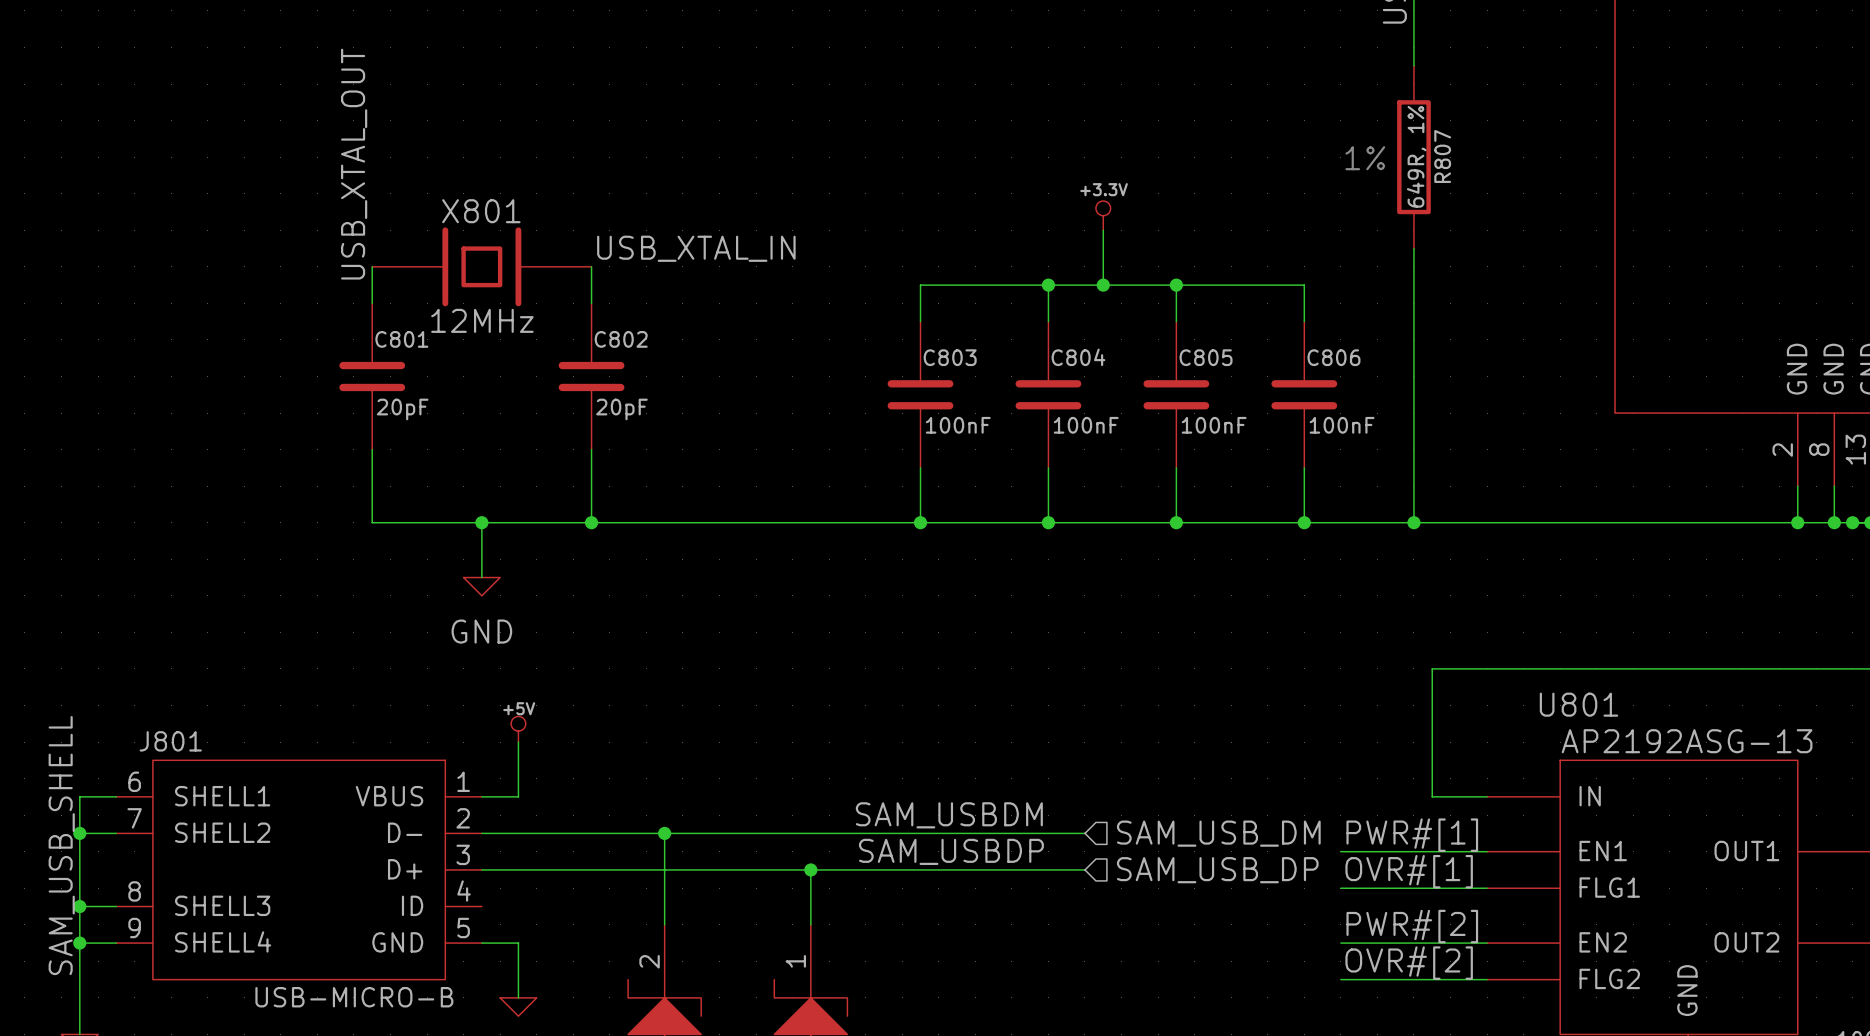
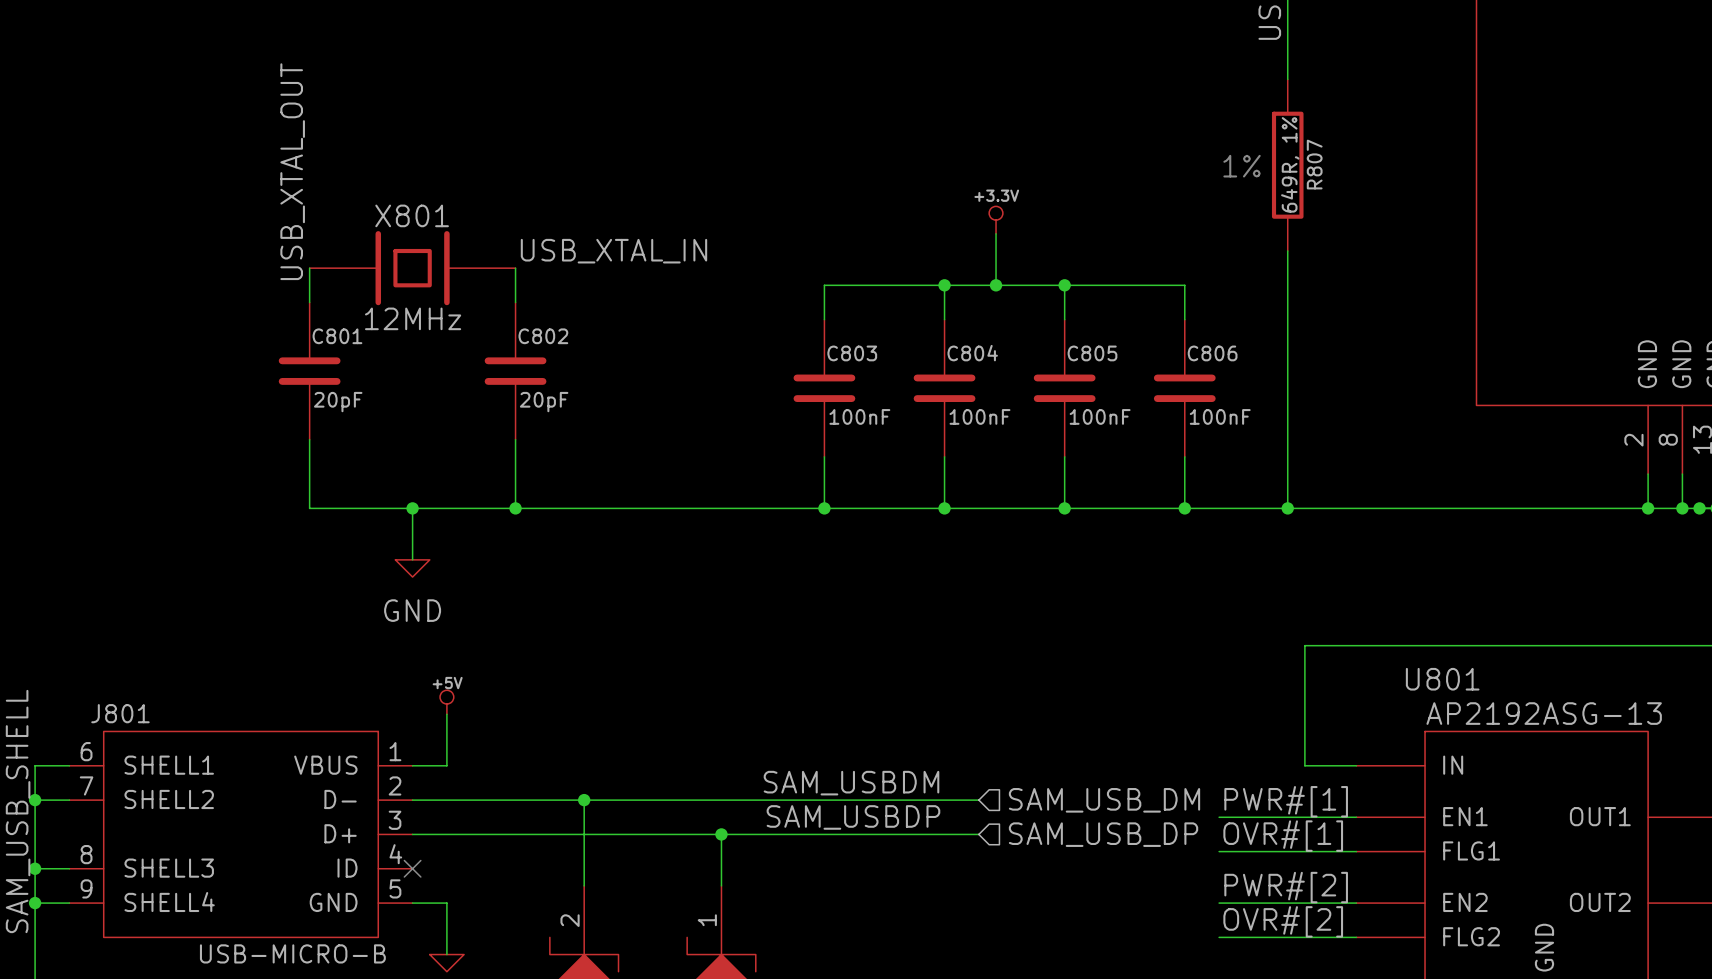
no-connect mark: none -> (412, 868)

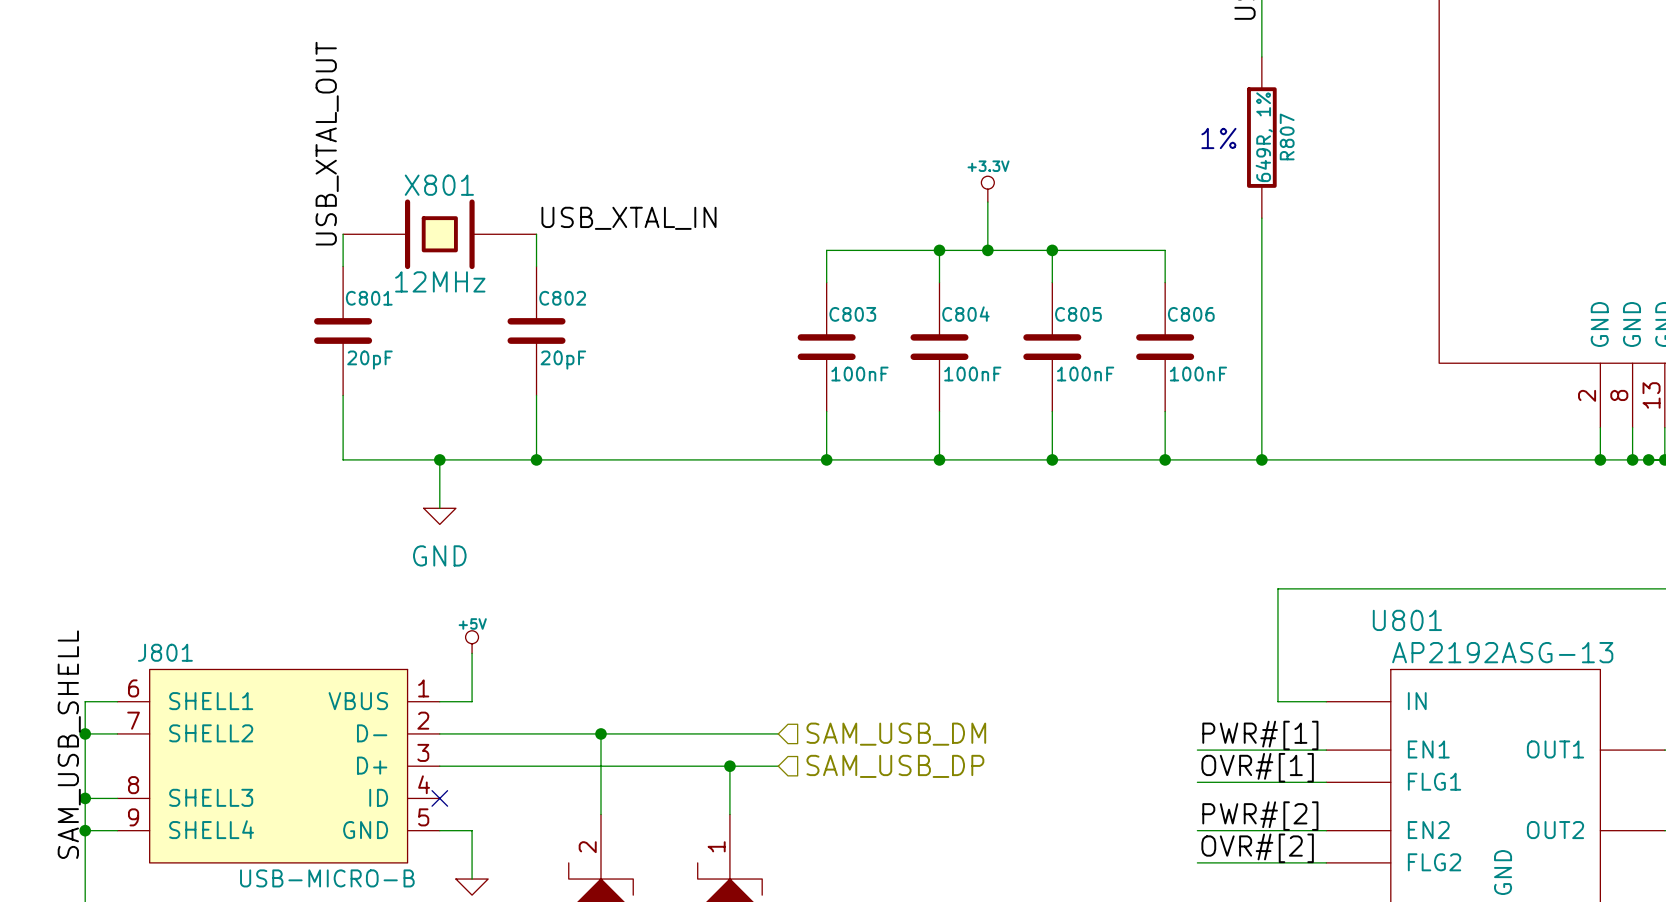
label: SAM_USBDM (851, 783) -> none
wire: (772, 800) (978, 800) -> none
hierarchical label position: SAM_USB_DM (1104, 800) -> SAM_USB_DM (896, 734)
label: SAM_USBDP (853, 817) -> none
wire: (772, 834) (978, 834) -> none
hierarchical label position: SAM_USB_DP (1103, 834) -> SAM_USB_DP (895, 766)

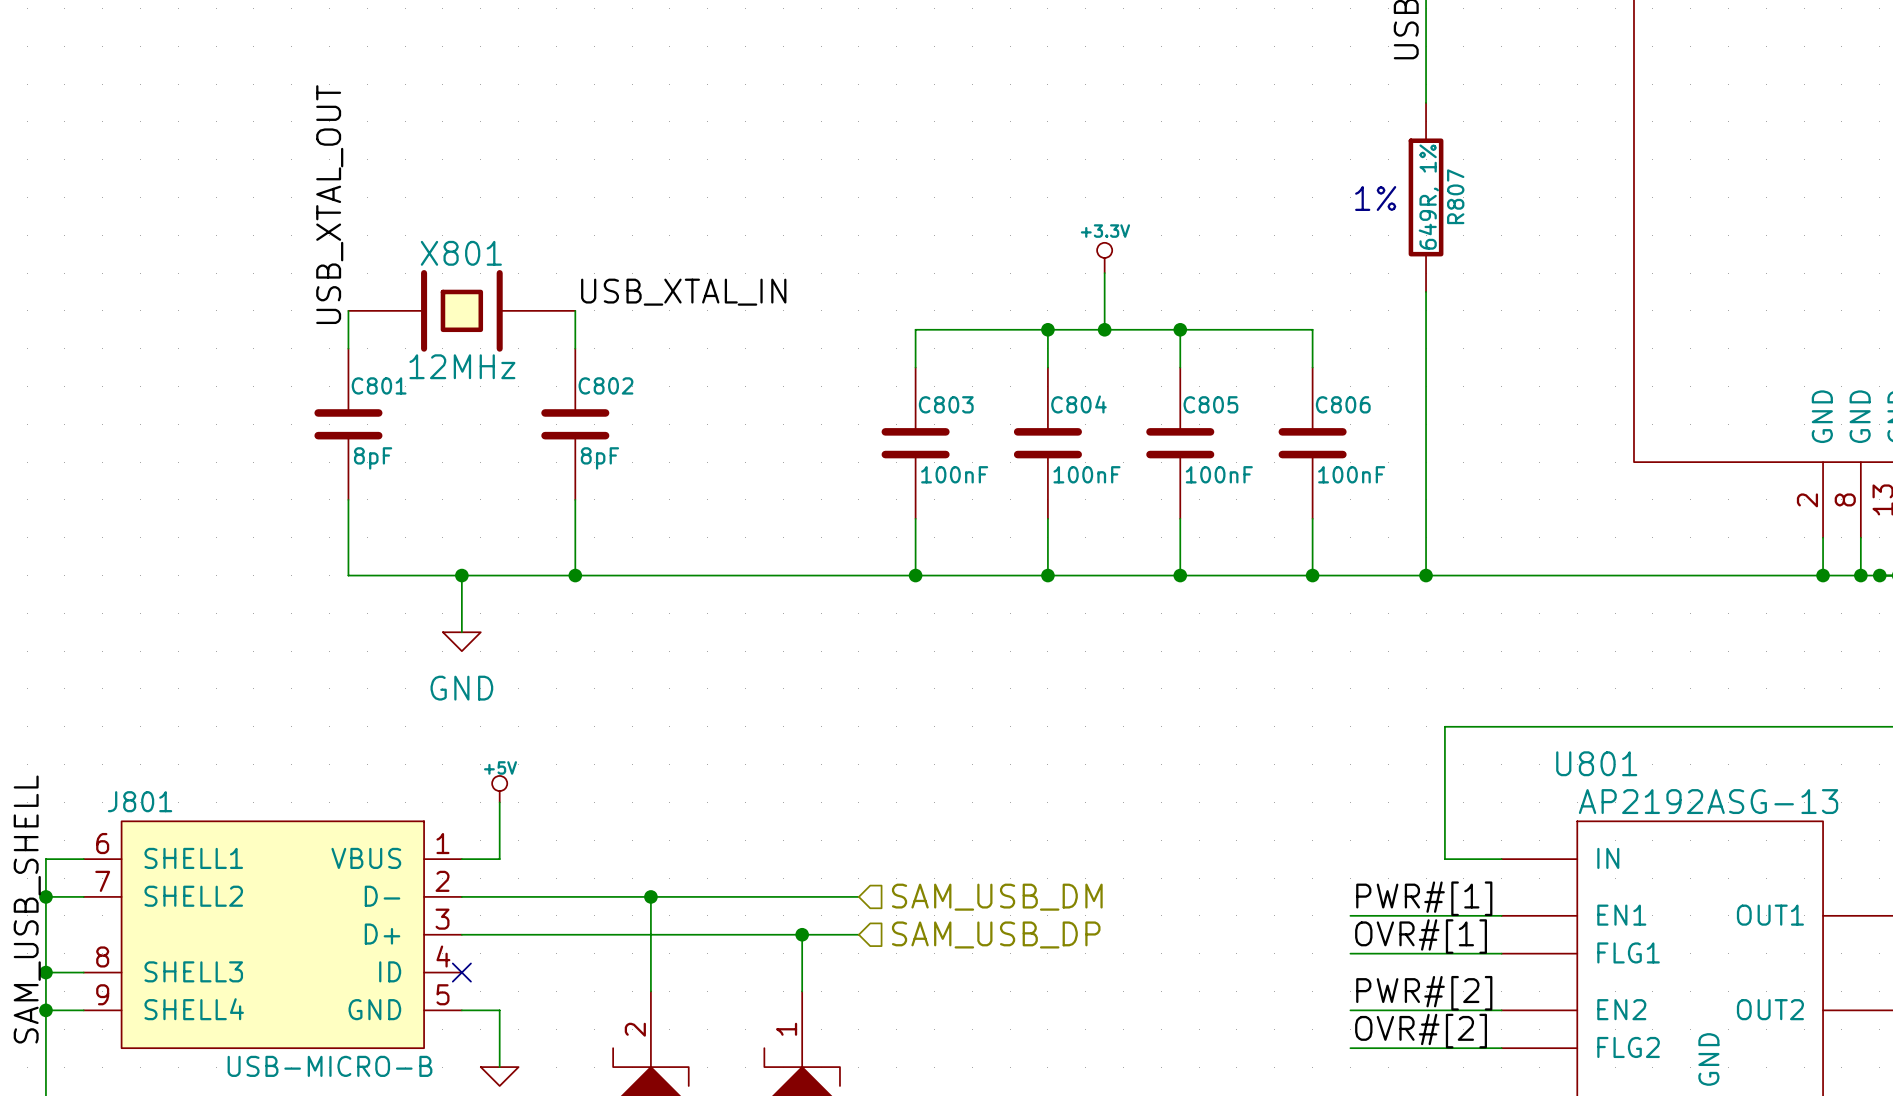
C801 value: 20pF (369, 360) -> 8pF (373, 458)
C802 value: 20pF (563, 360) -> 8pF (599, 458)

